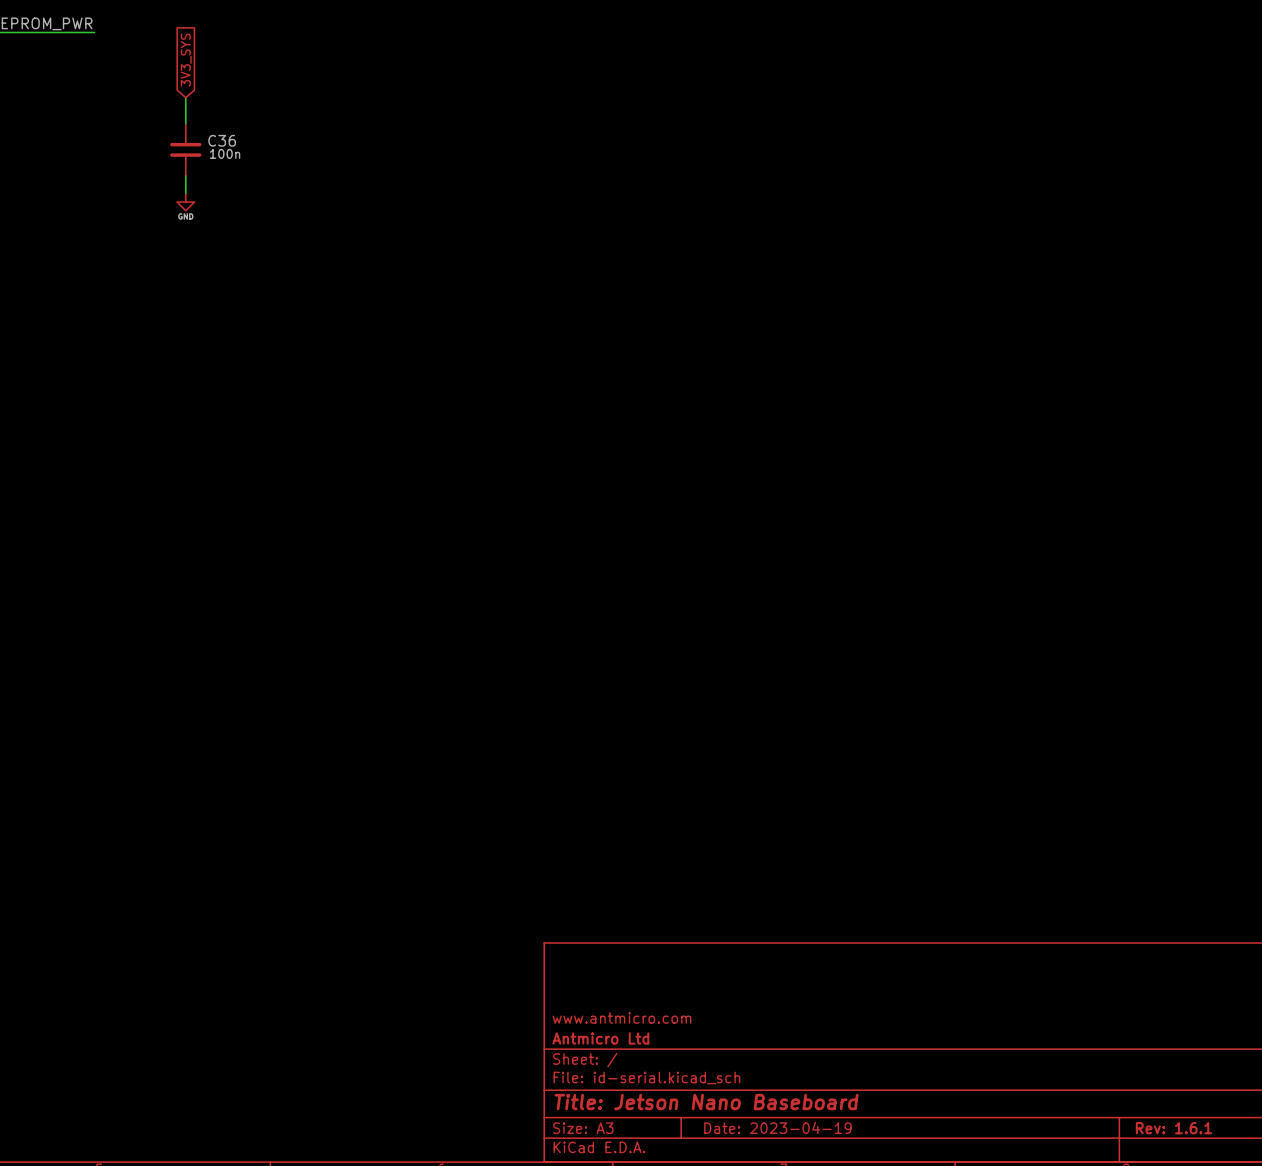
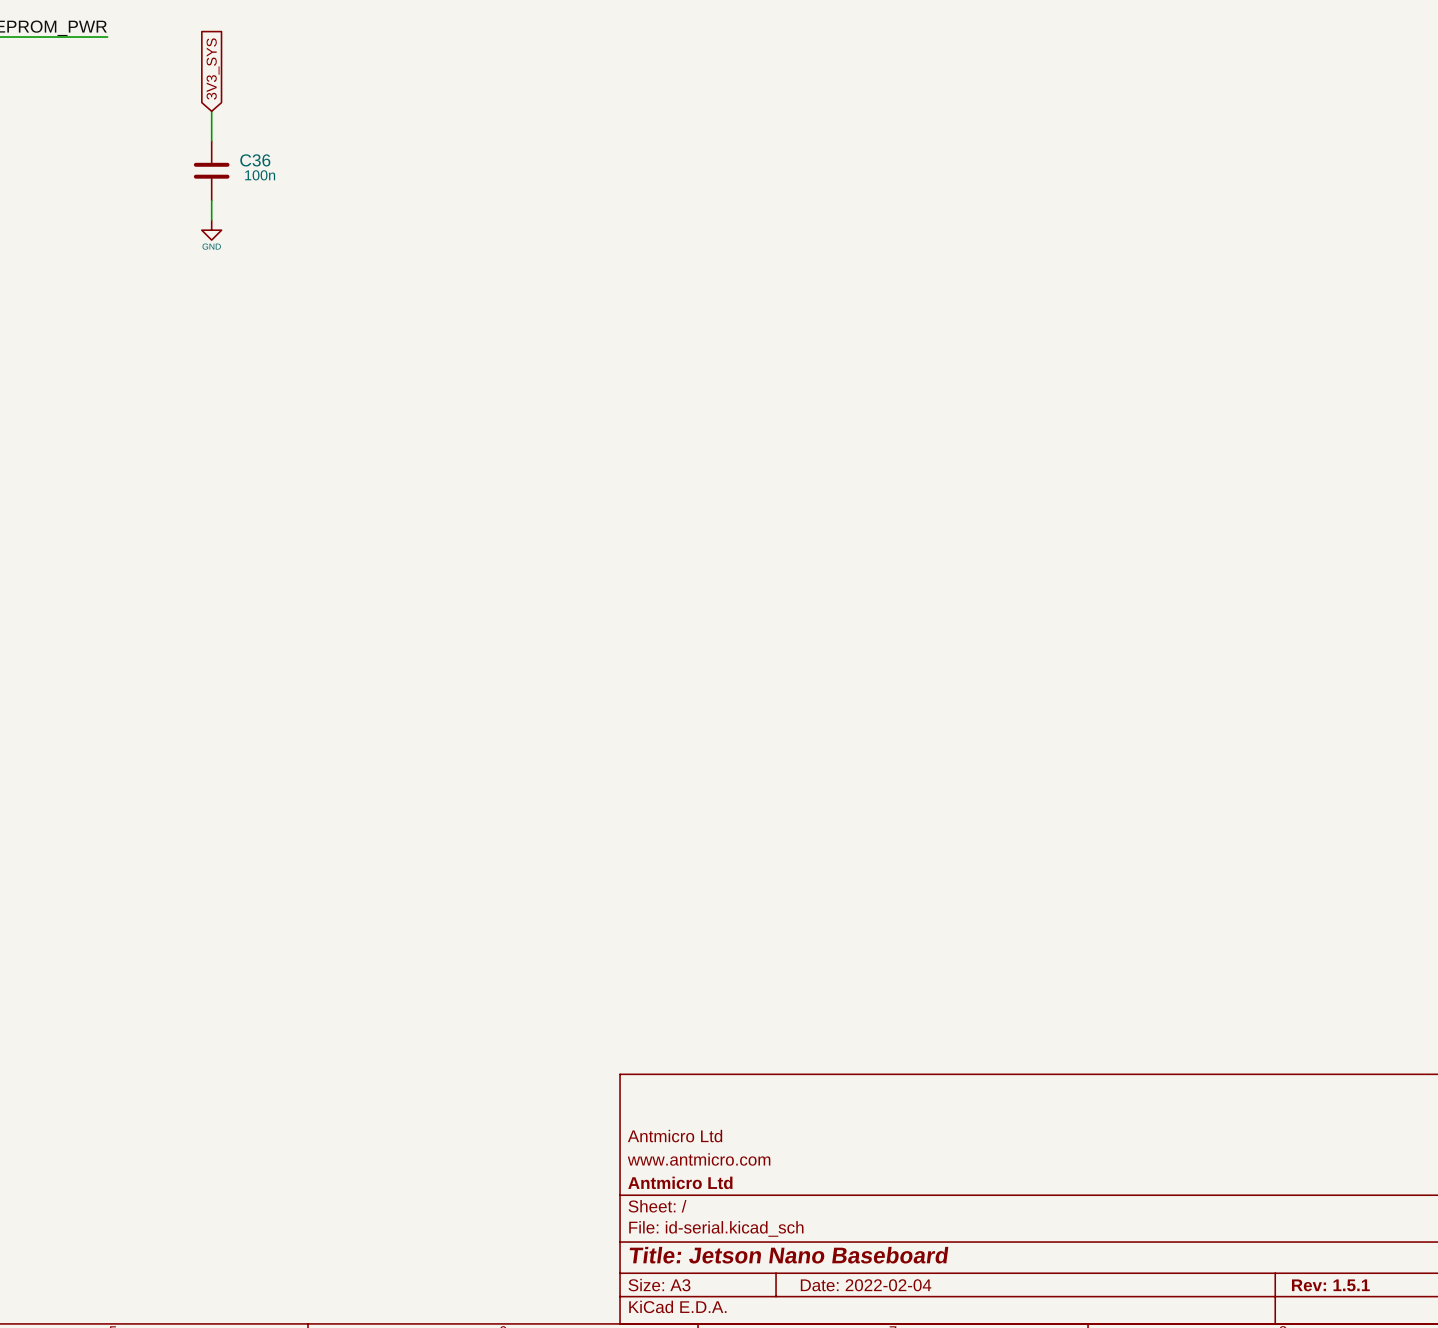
title block: none -> Antmicro Ltd (675, 1136)
title block: Date: 2023-04-19 (777, 1127) -> Date: 2022-02-04 (866, 1285)
title block: Rev: 1.6.1 (1174, 1128) -> Rev: 1.5.1 (1330, 1285)

